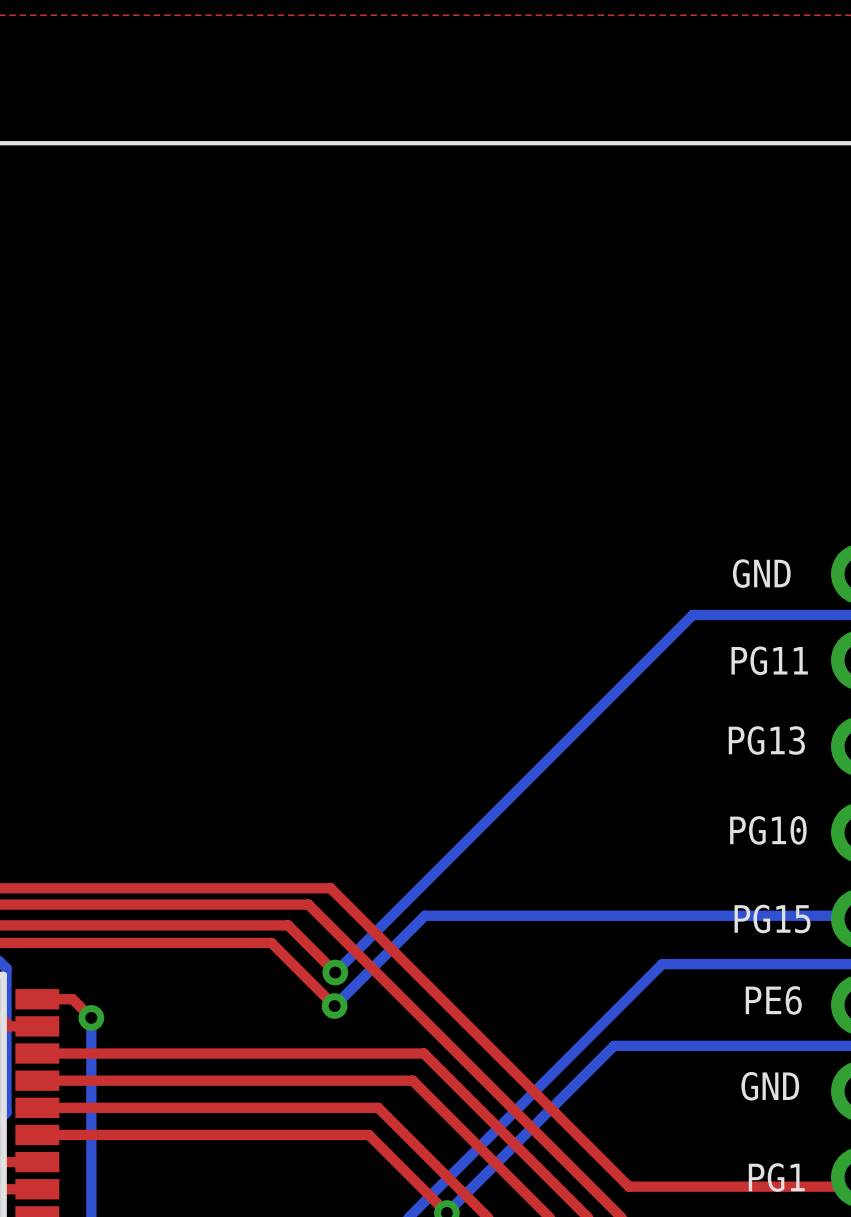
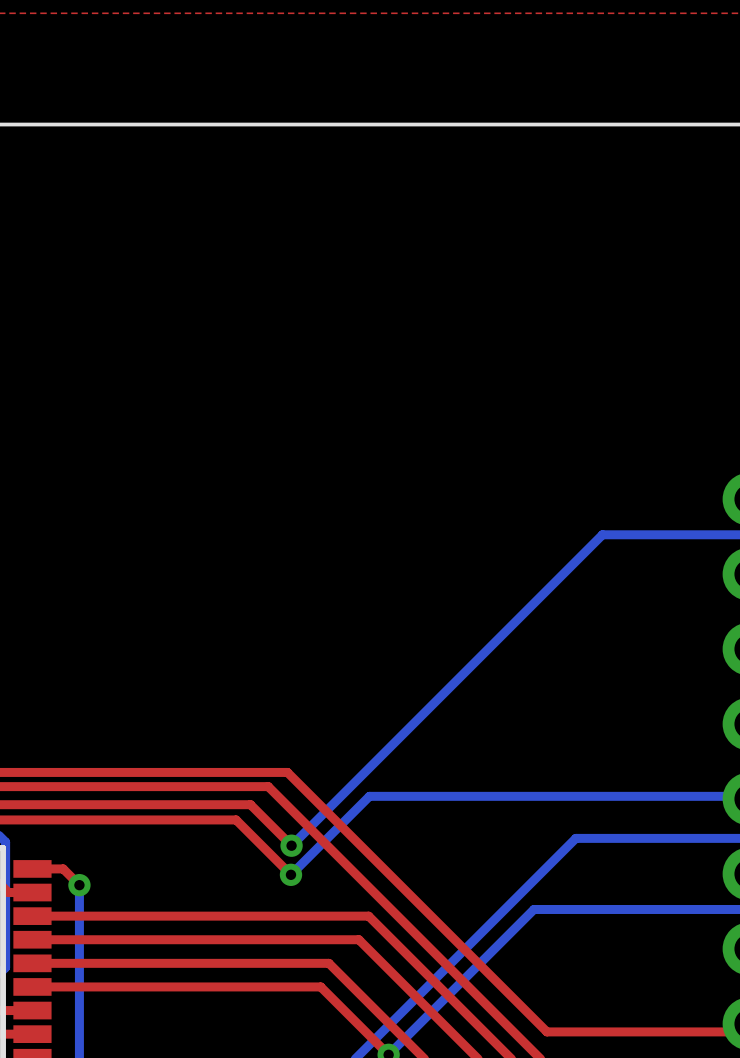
text: GND (761, 573) -> none
text: PG11 (769, 660) -> none
text: PG13 (766, 740) -> none
text: PG10 (768, 830) -> none
text: PG15 (772, 918) -> none
text: PE6 (773, 1000) -> none
text: GND (770, 1086) -> none
text: PG1 (776, 1177) -> none

